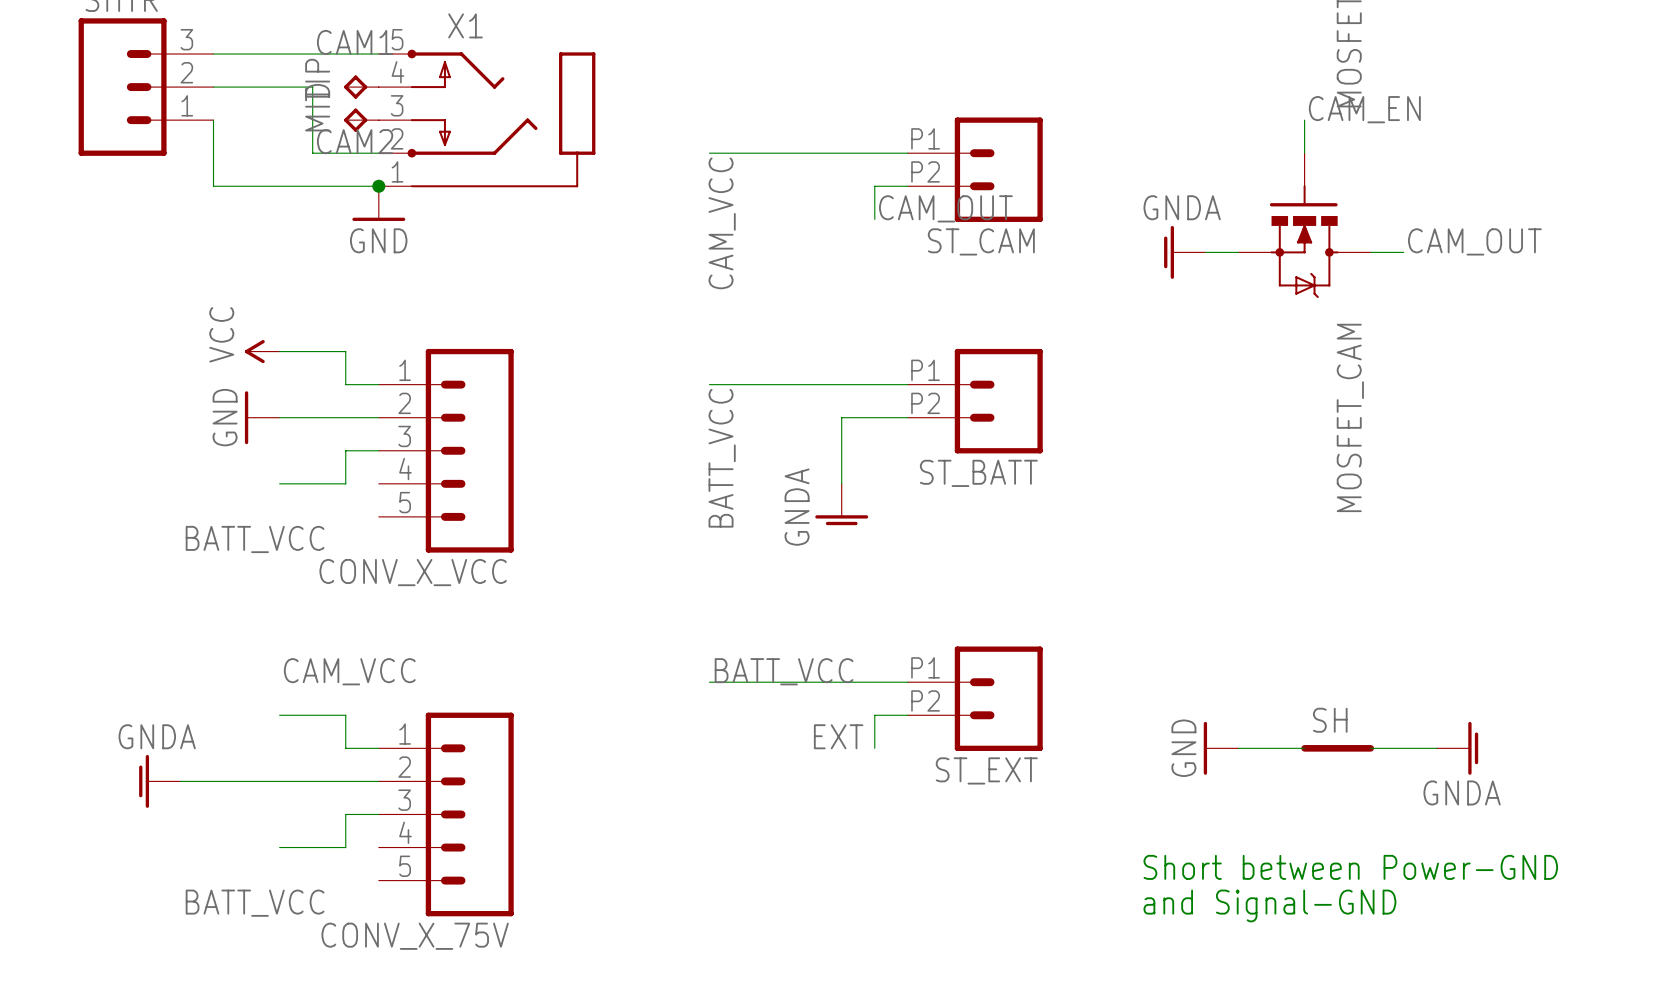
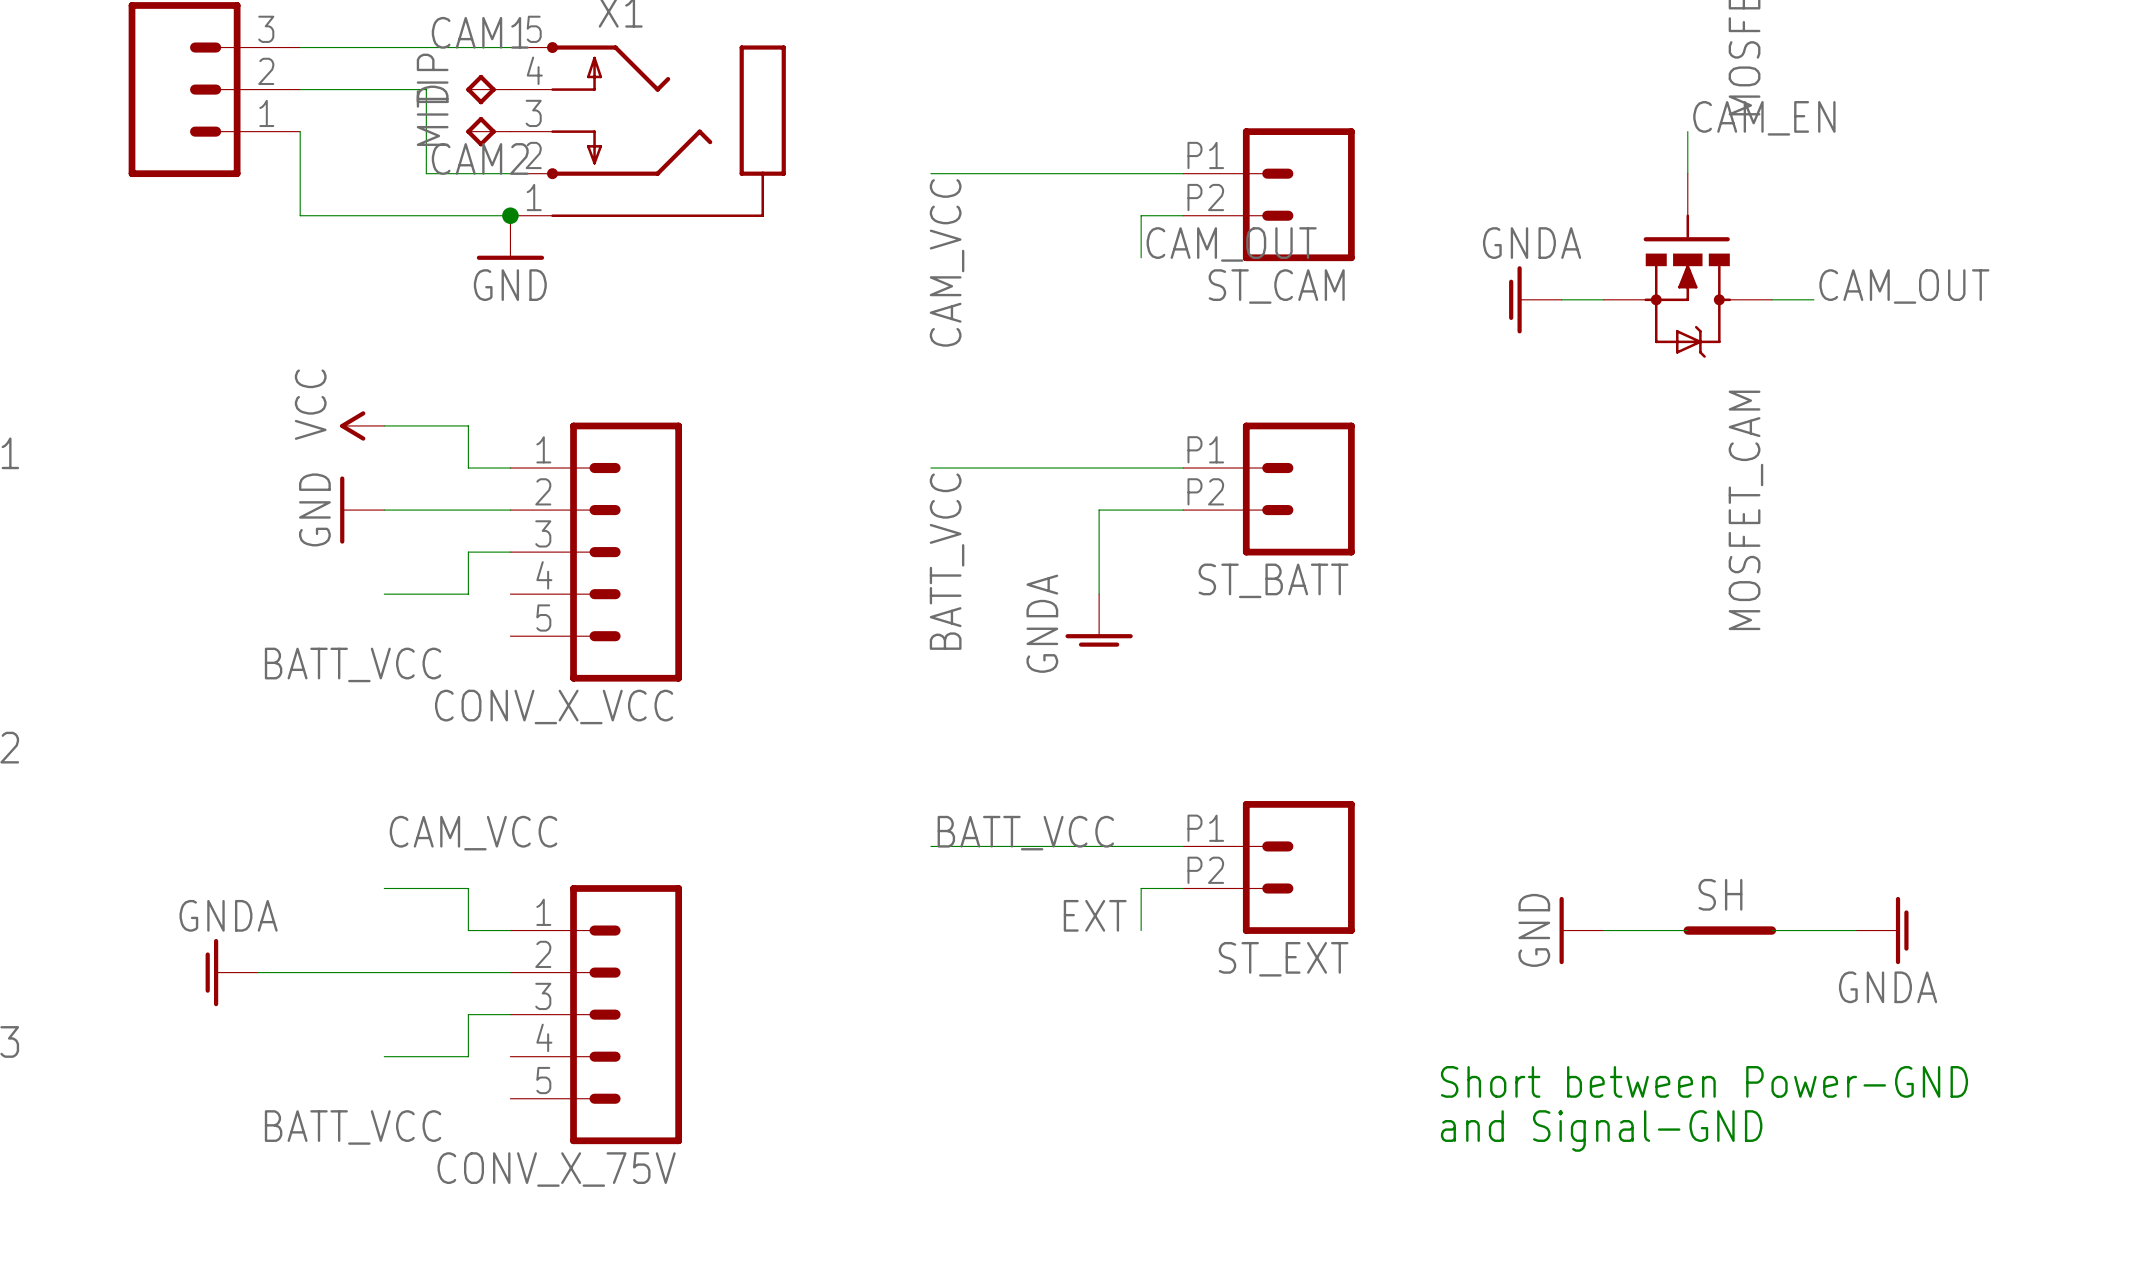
text position: Short between Power-GND (1350, 867) -> Short between Power-GND (1704, 1081)
text position: and Signal-GND (1269, 905) -> and Signal-GND (1601, 1130)

